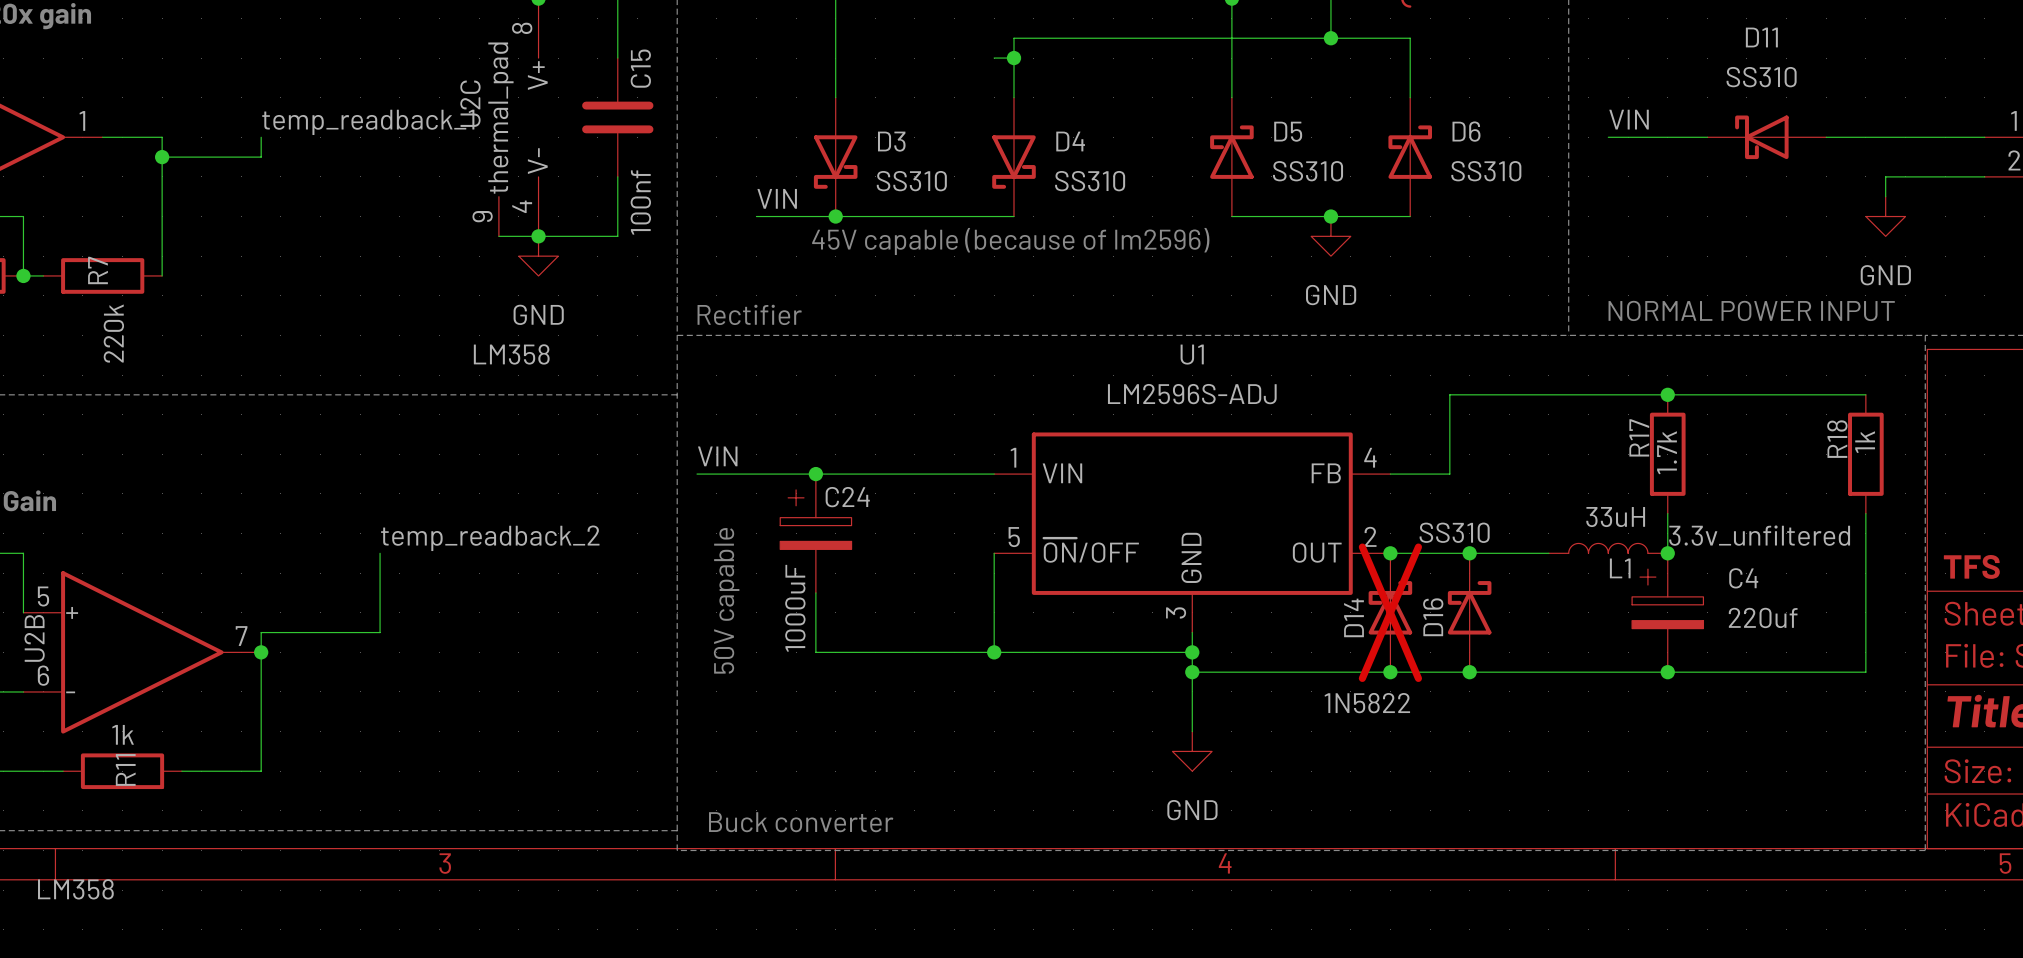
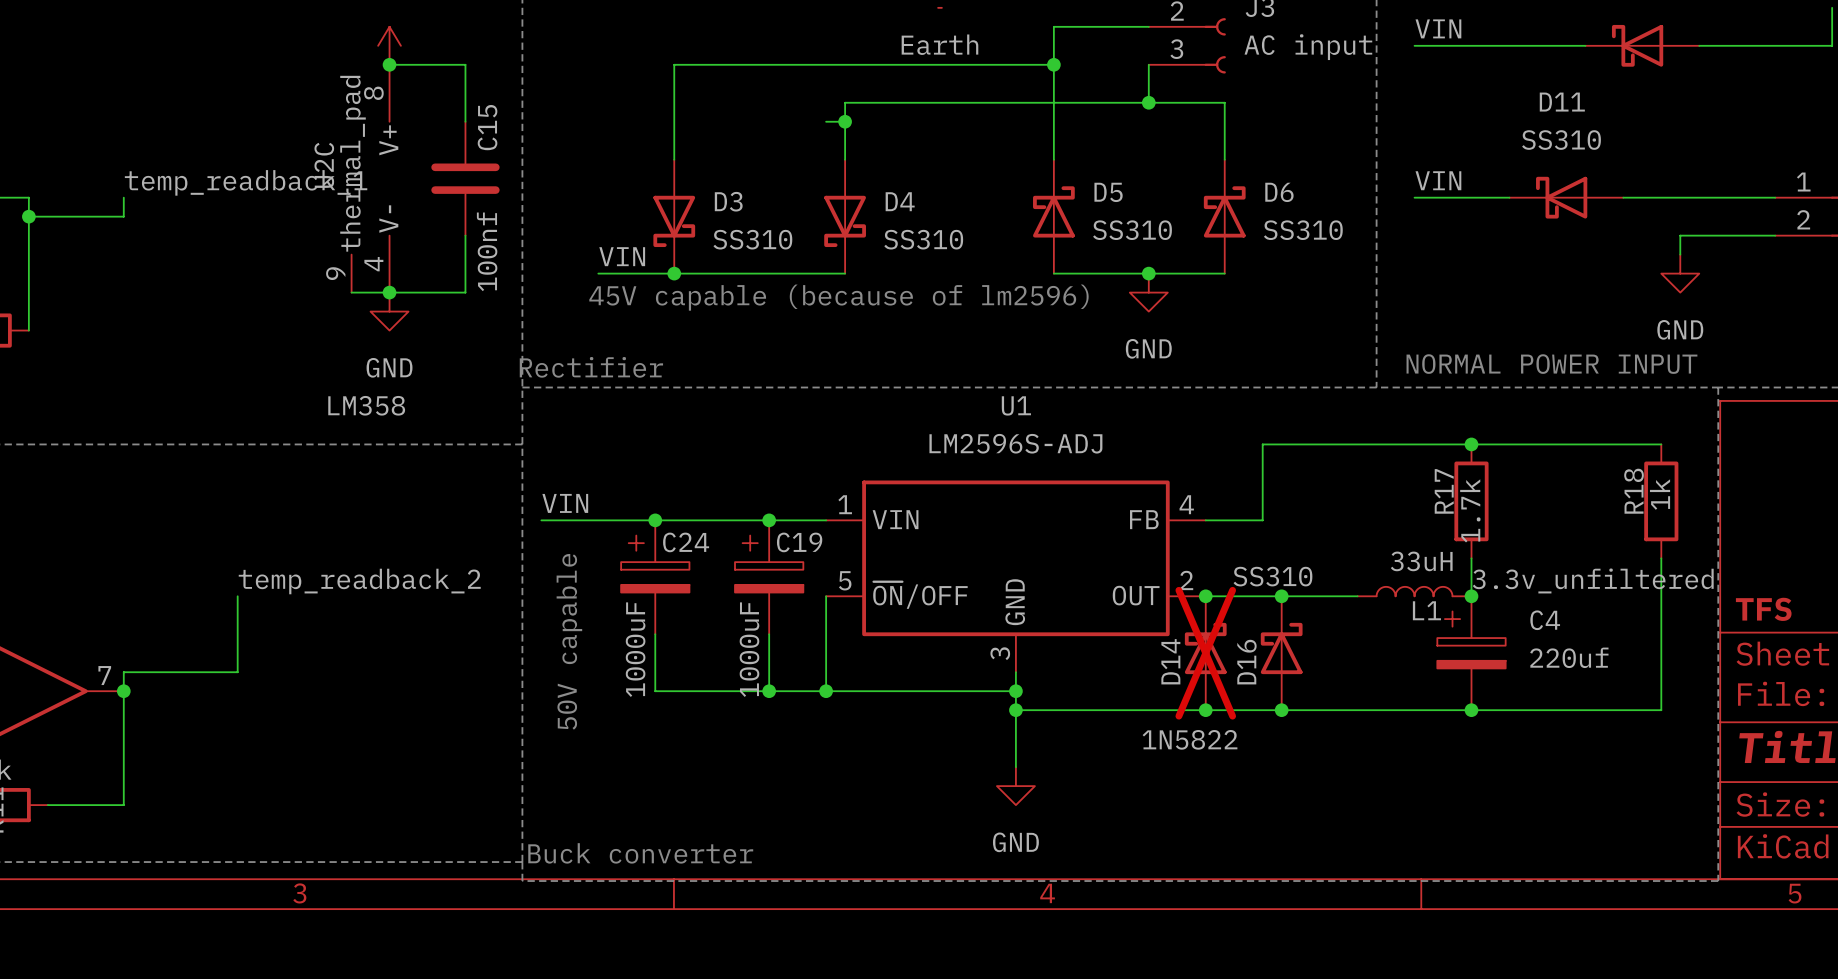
junction: none -> (769, 520)
C19: none -> 1000uF (769, 577)
wire: none -> (769, 634) (769, 691)
junction: none -> (769, 691)

